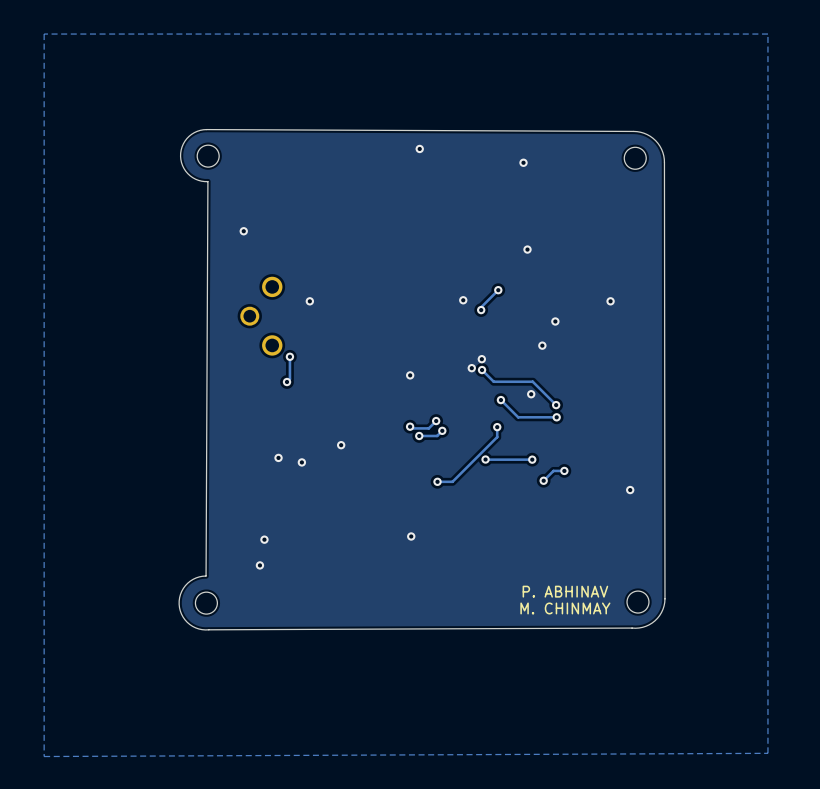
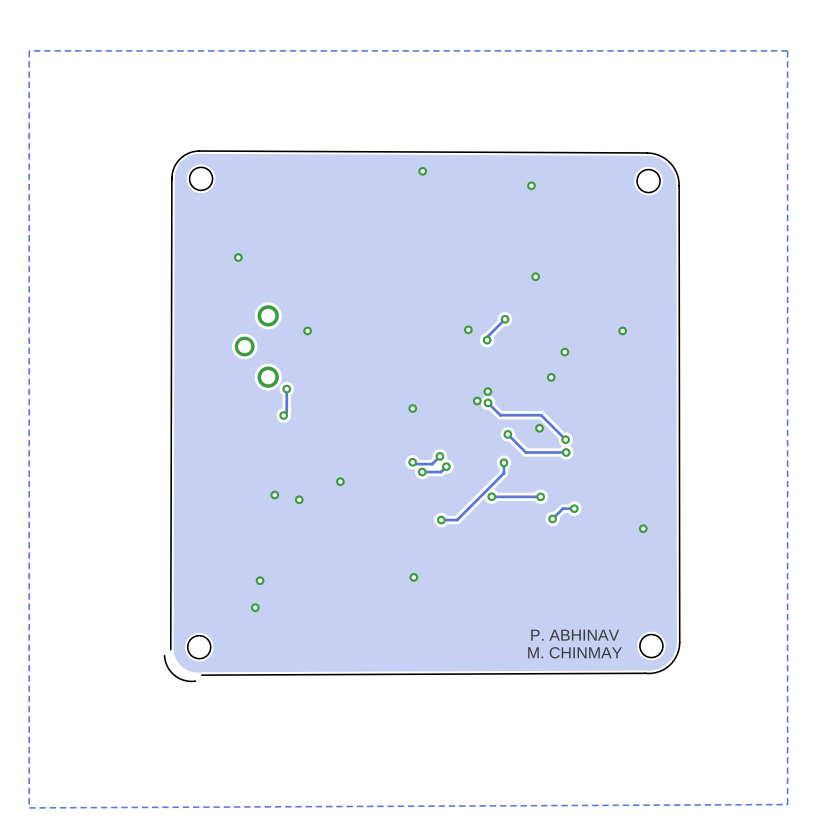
board edge: (206, 129) (197, 131) (189, 136) (183, 143) (180, 156) (182, 165) (187, 173) (195, 179) (207, 181) (206, 576) (196, 577) (187, 583) (181, 591) (179, 604) (183, 617) (189, 624) (198, 628) (208, 629) -> (199, 151) (187, 153) (179, 159) (173, 170) (171, 179)
board edge: none -> (171, 177) (170, 649)
board edge: none -> (164, 655) (166, 665) (174, 675) (185, 680) (195, 681)

